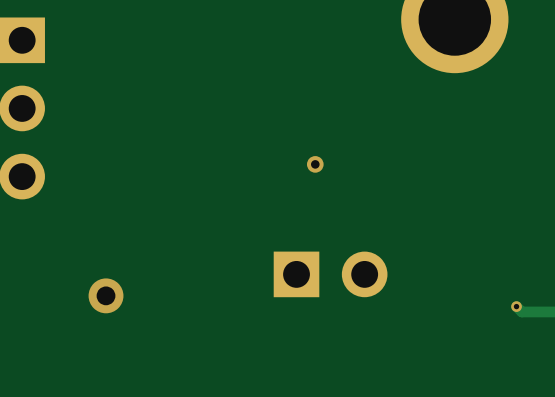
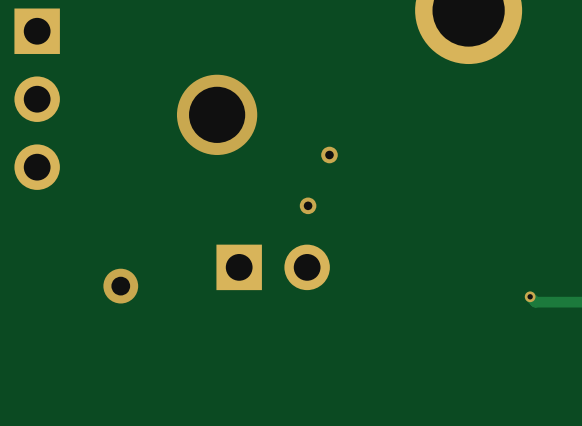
via: none -> (217, 114)
via: none -> (308, 205)
part position: (330, 274) -> (273, 267)

